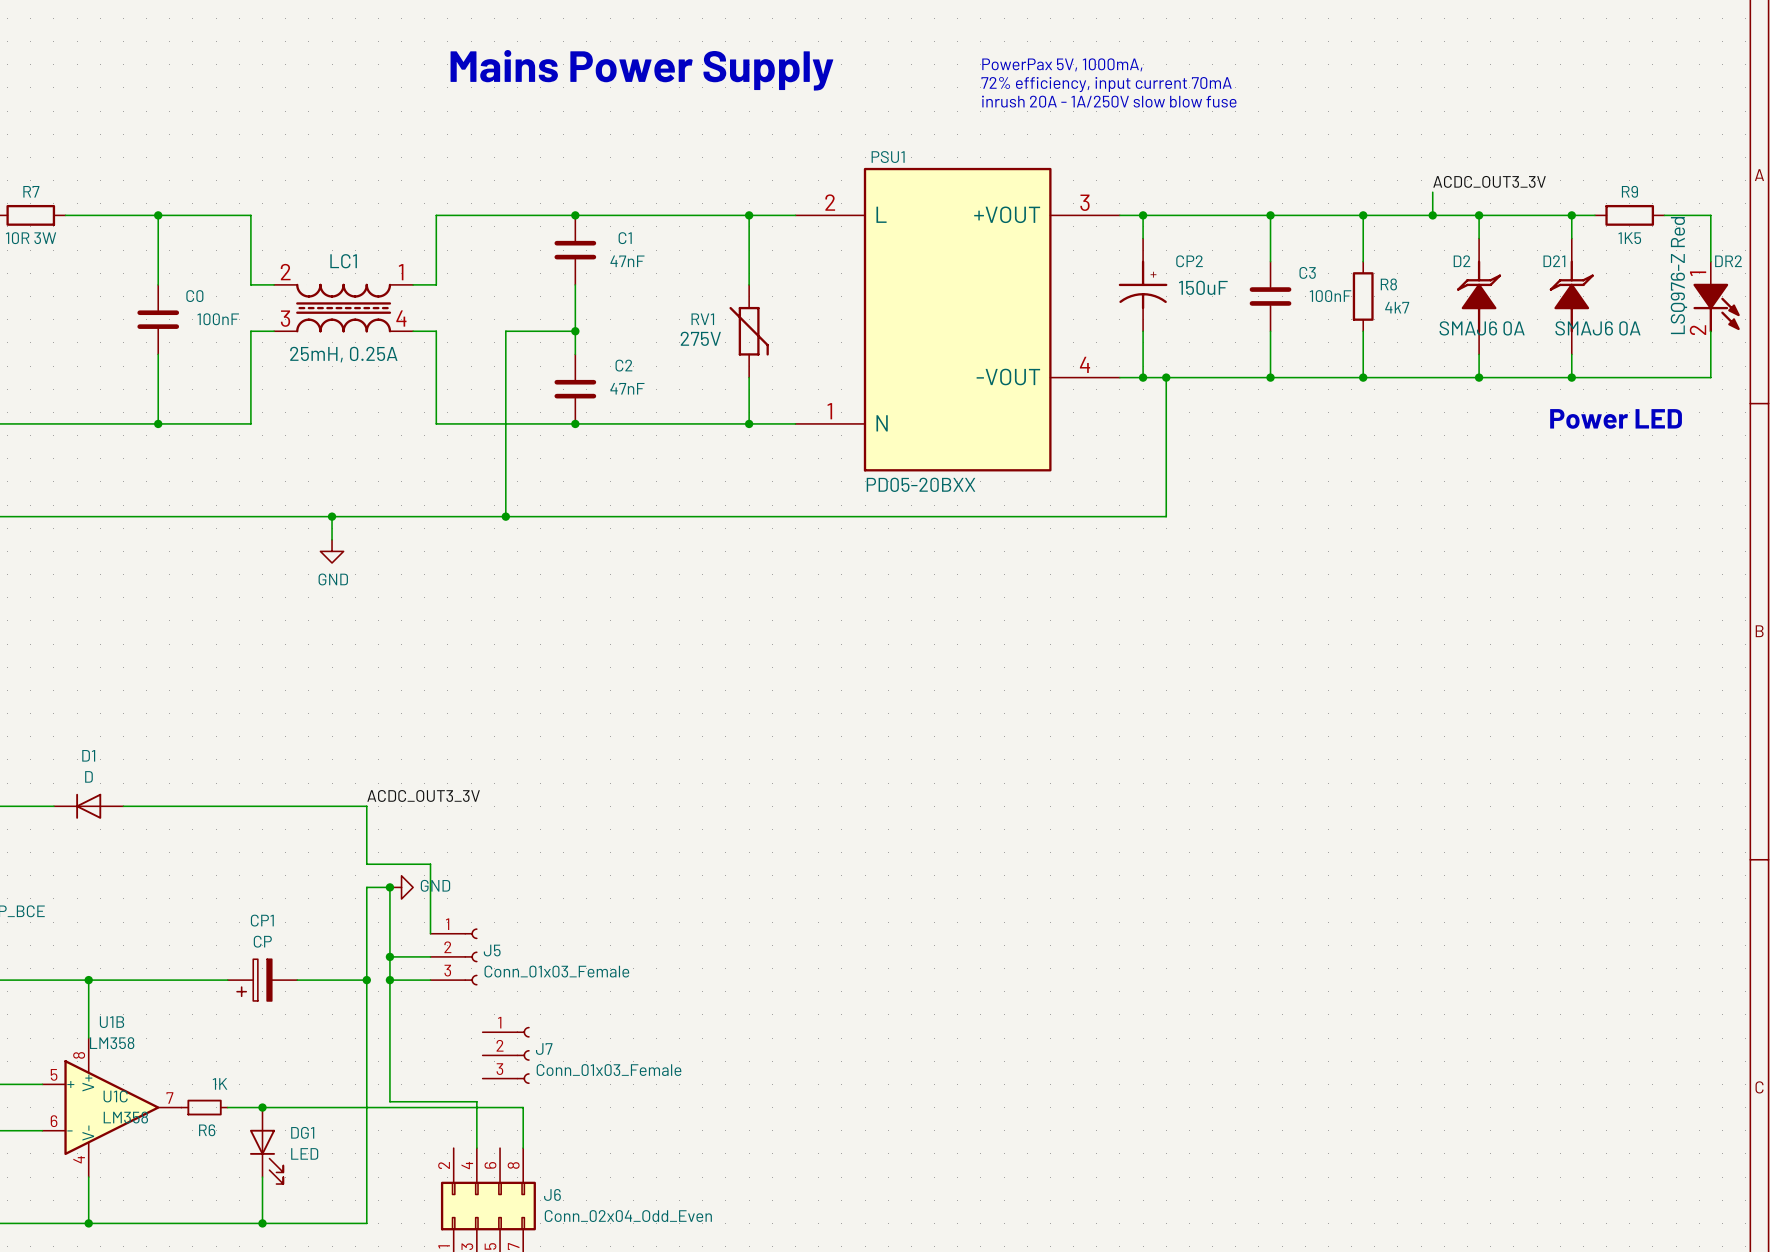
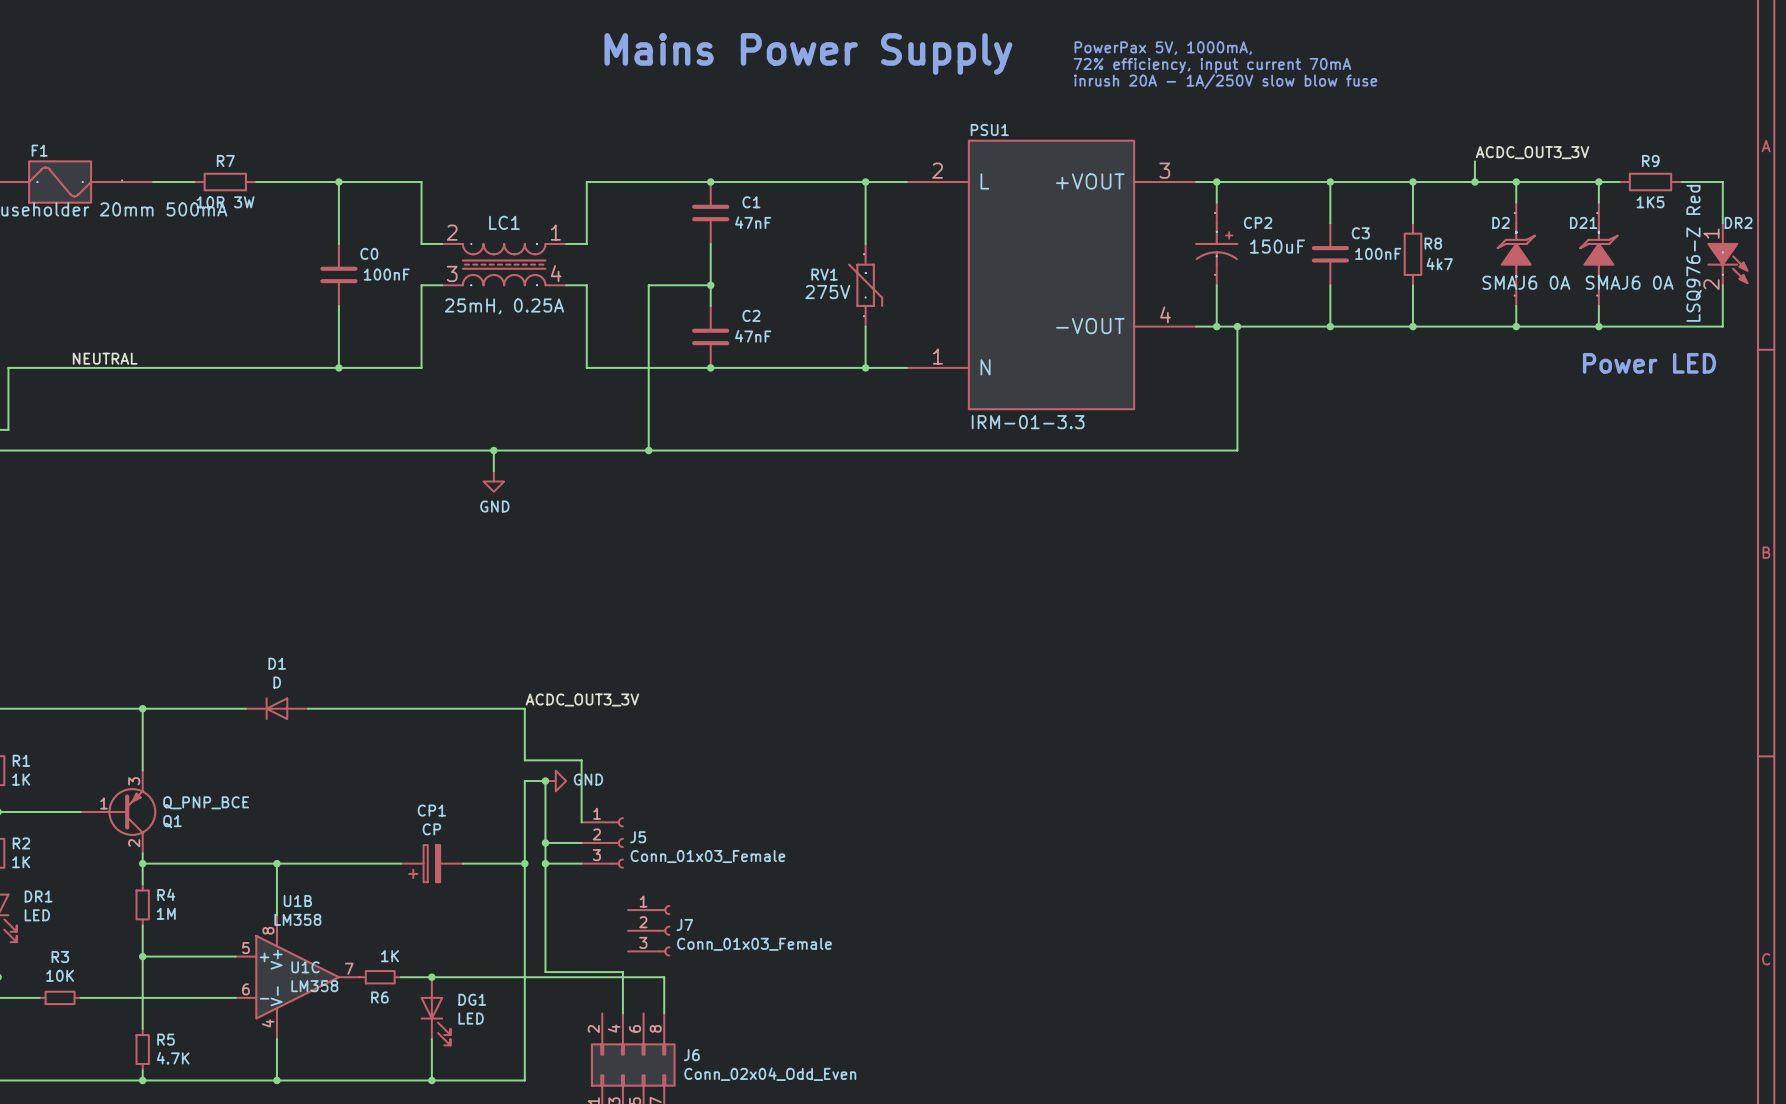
PSU1 value: PD05-20BXX (920, 484) -> IRM-01-3.3 (1028, 422)

